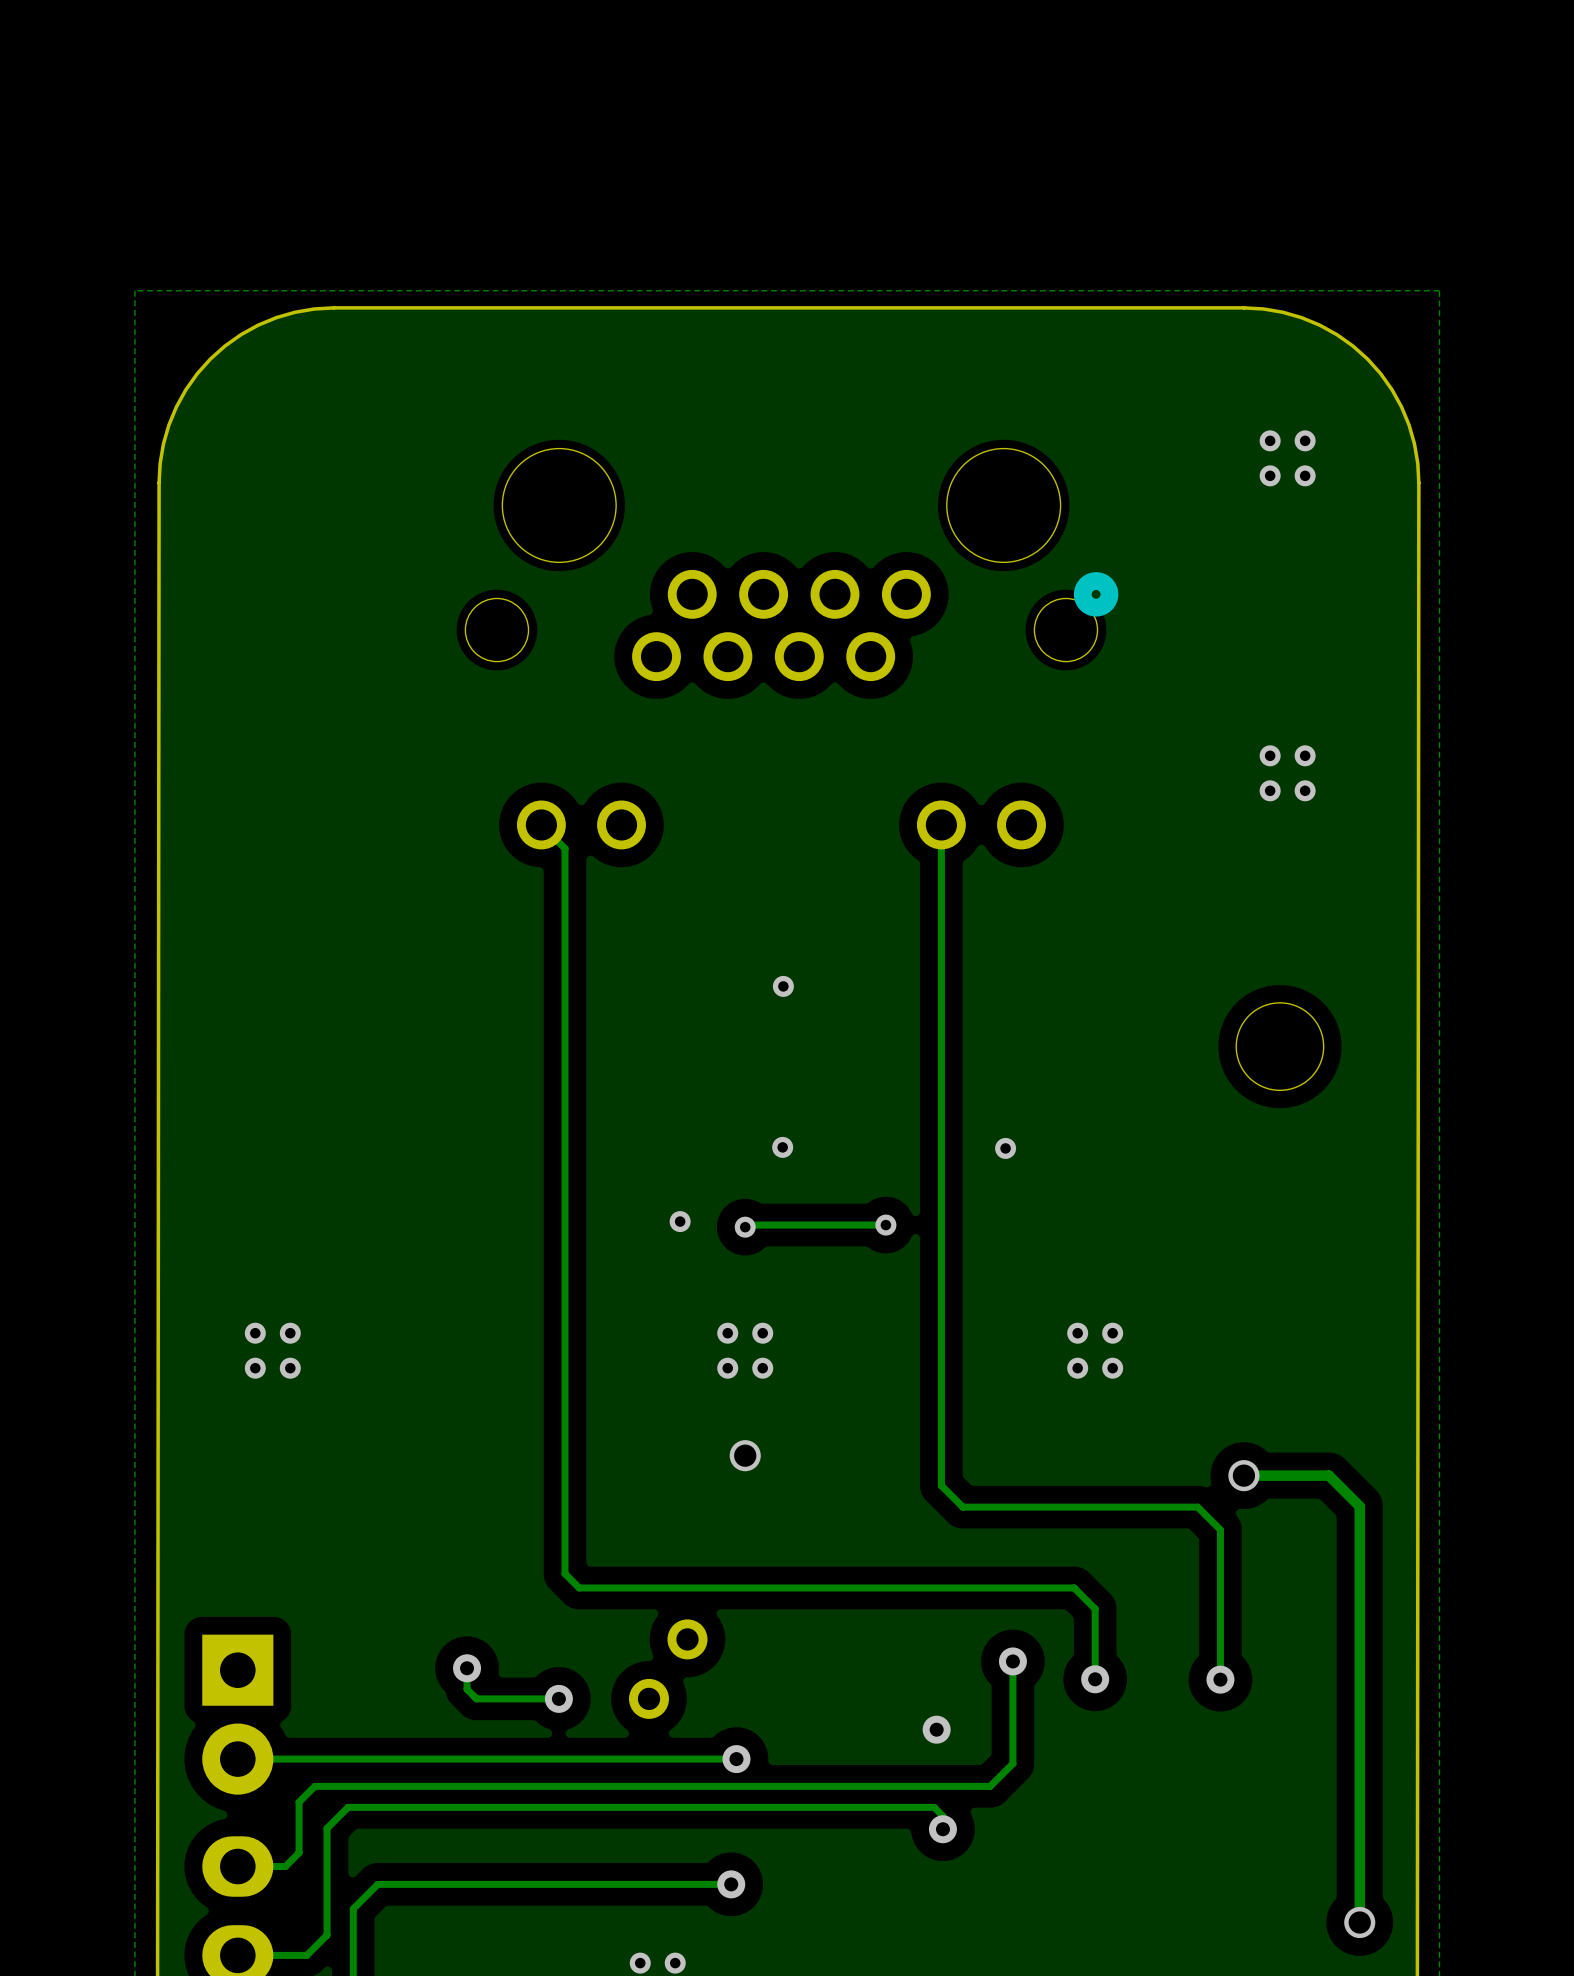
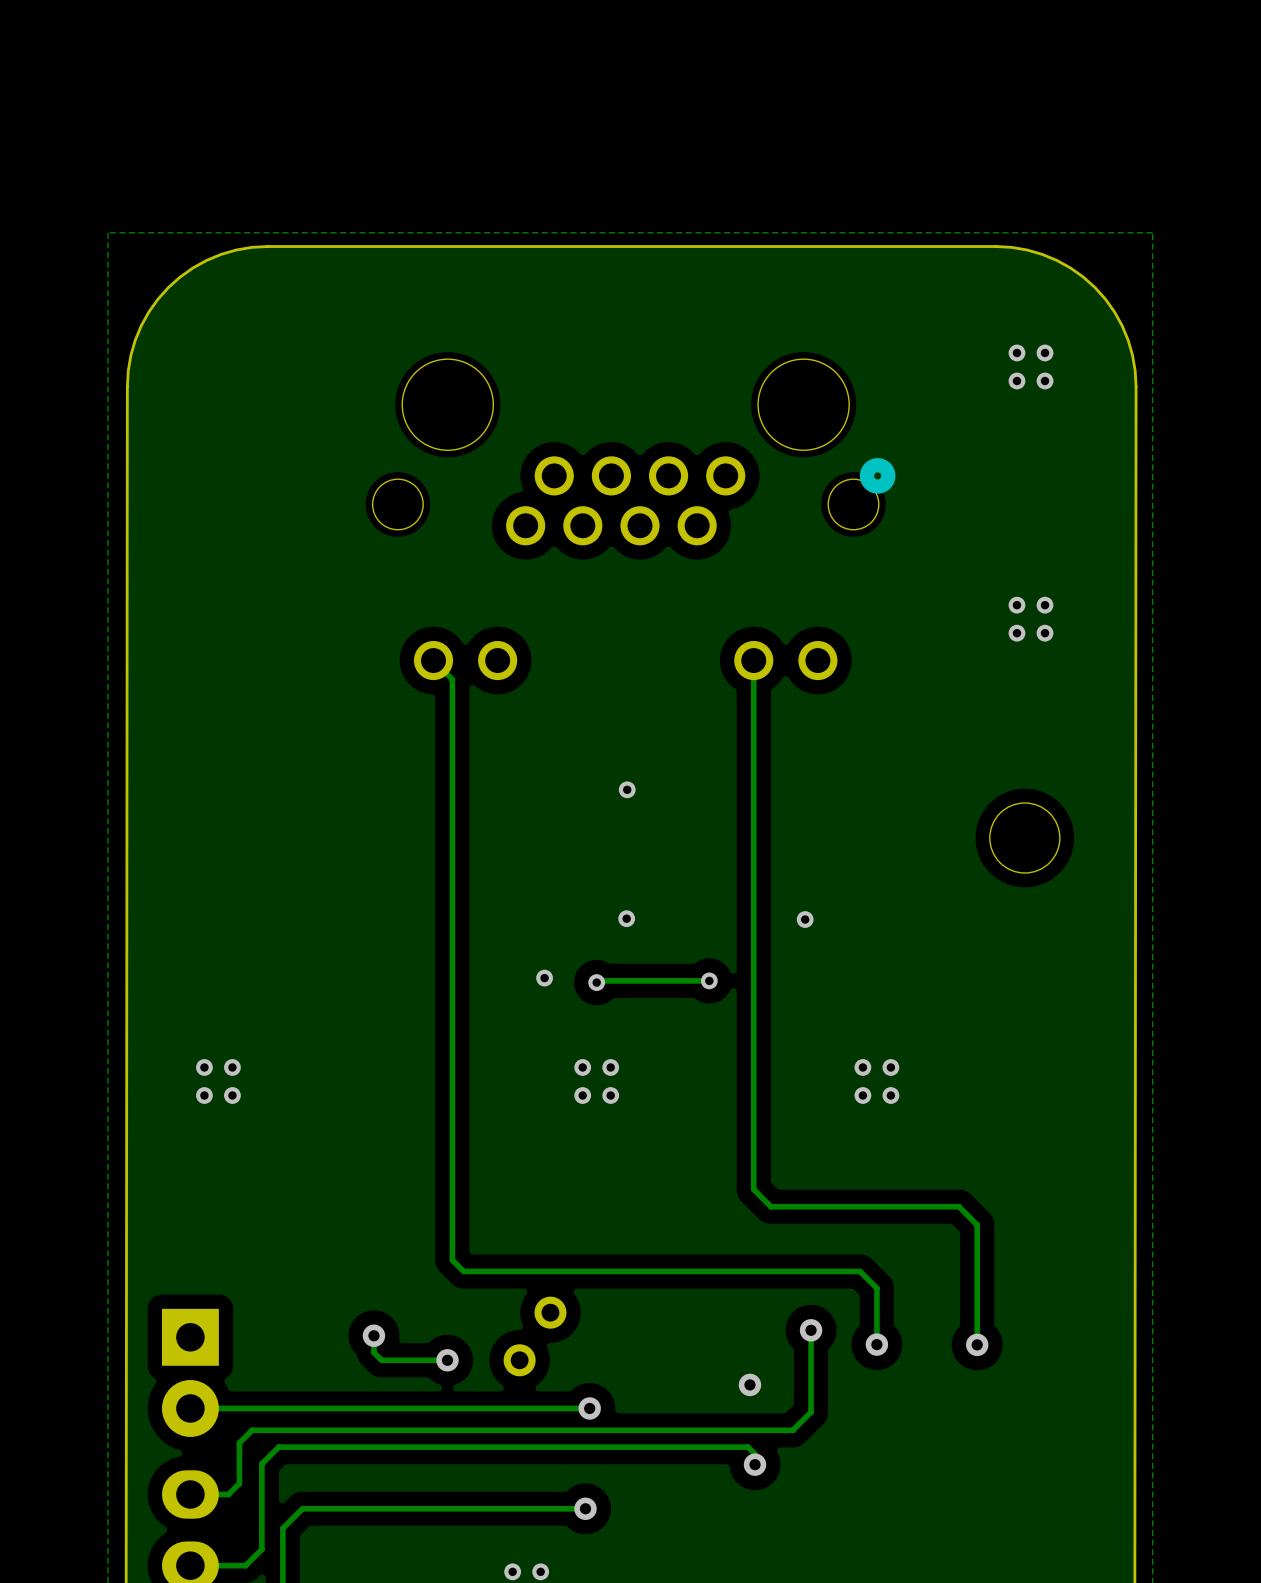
via: (745, 1455) -> none
track: (1243, 1475) (1328, 1475) (1359, 1506) (1359, 1922) -> none
via: (1243, 1475) -> none
via: (1359, 1922) -> none

